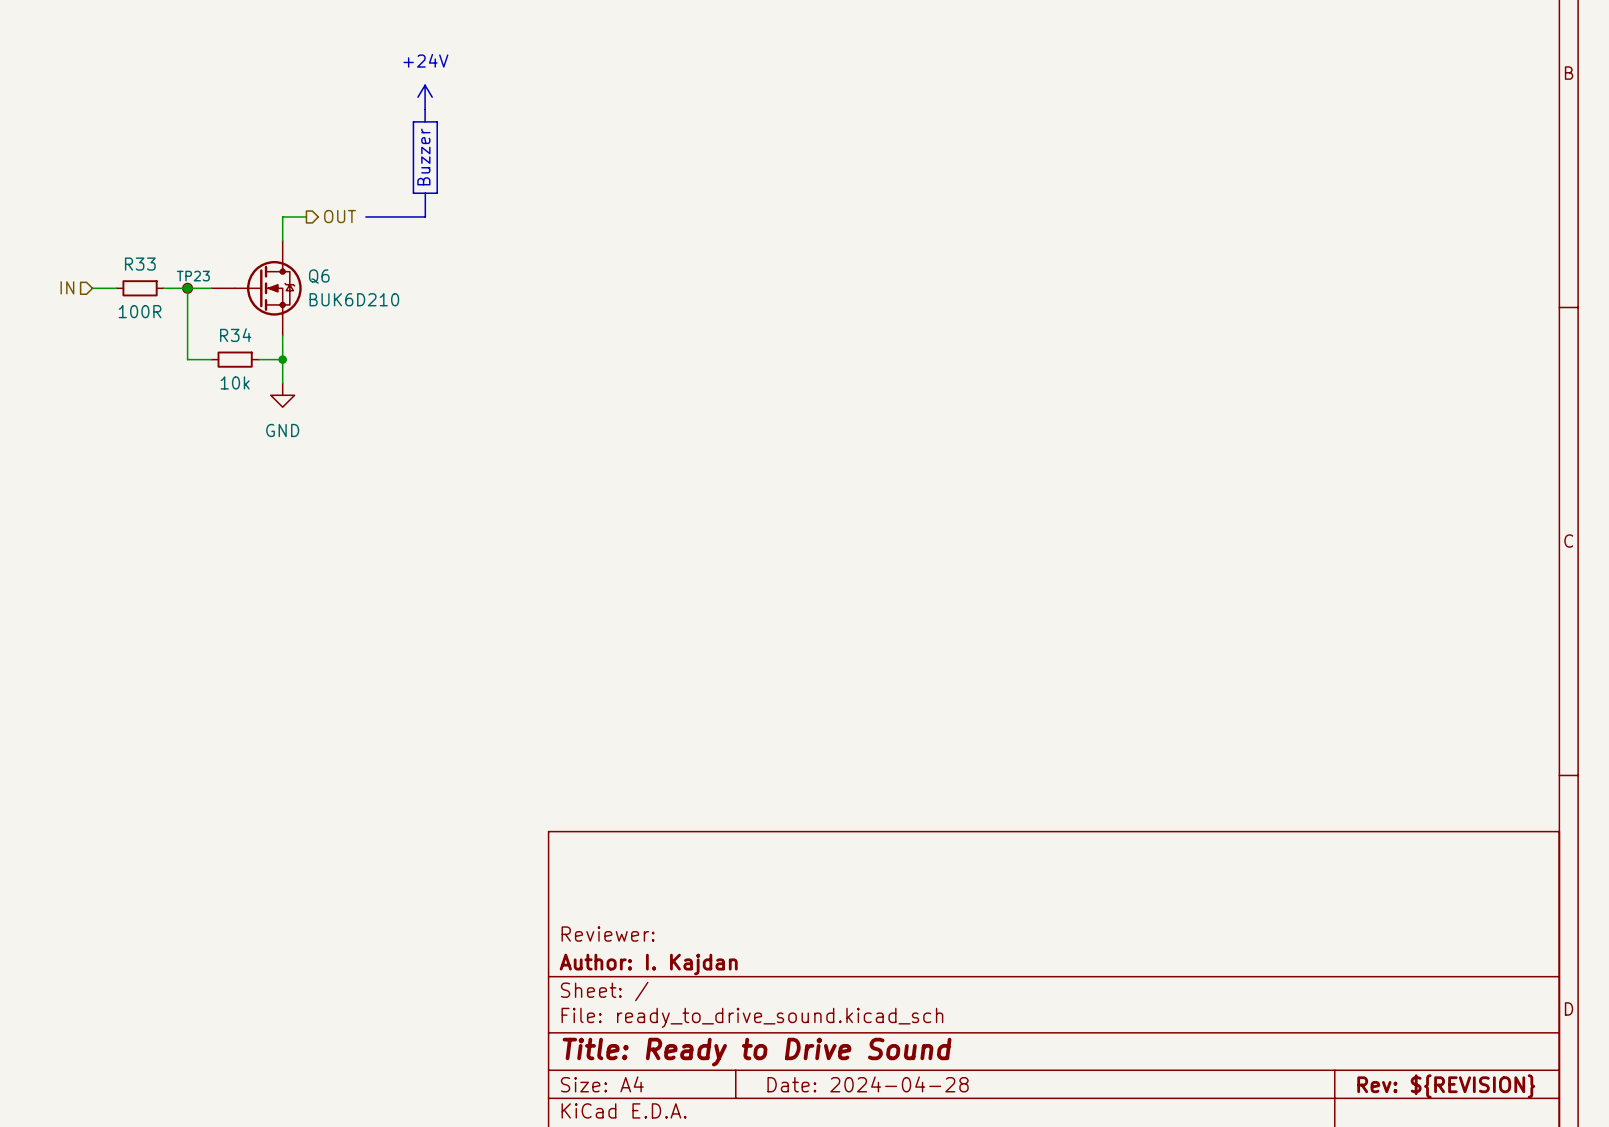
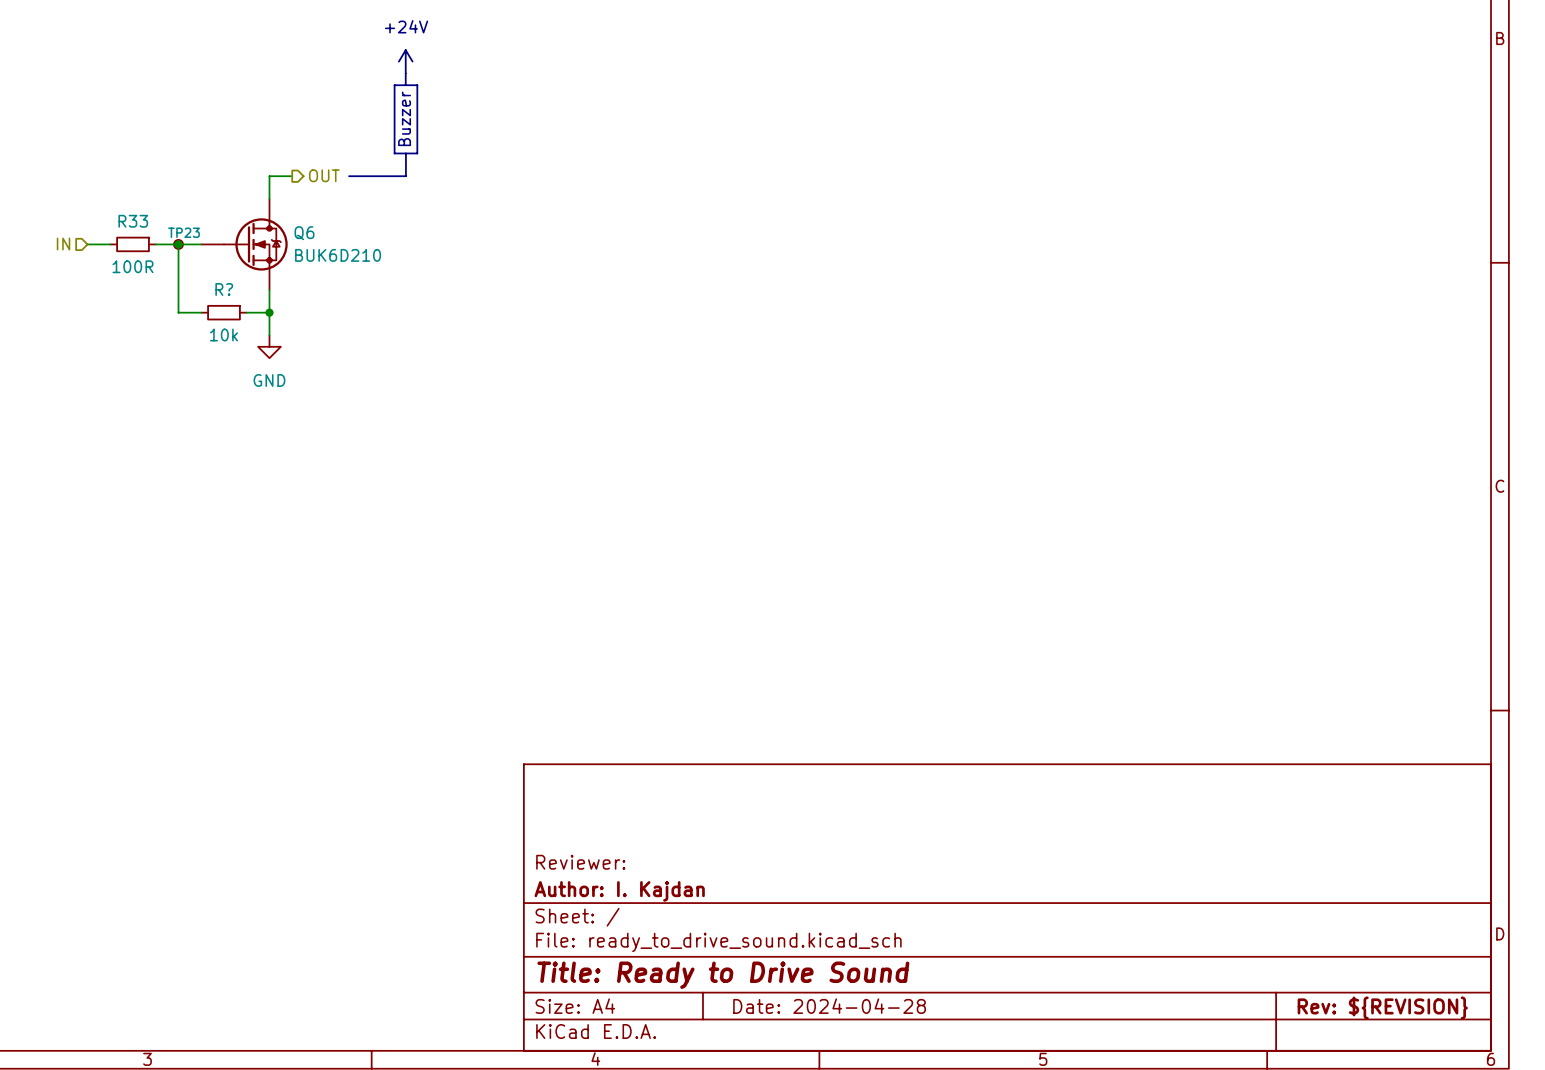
R34 name: R34 (235, 335) -> R? (224, 289)

